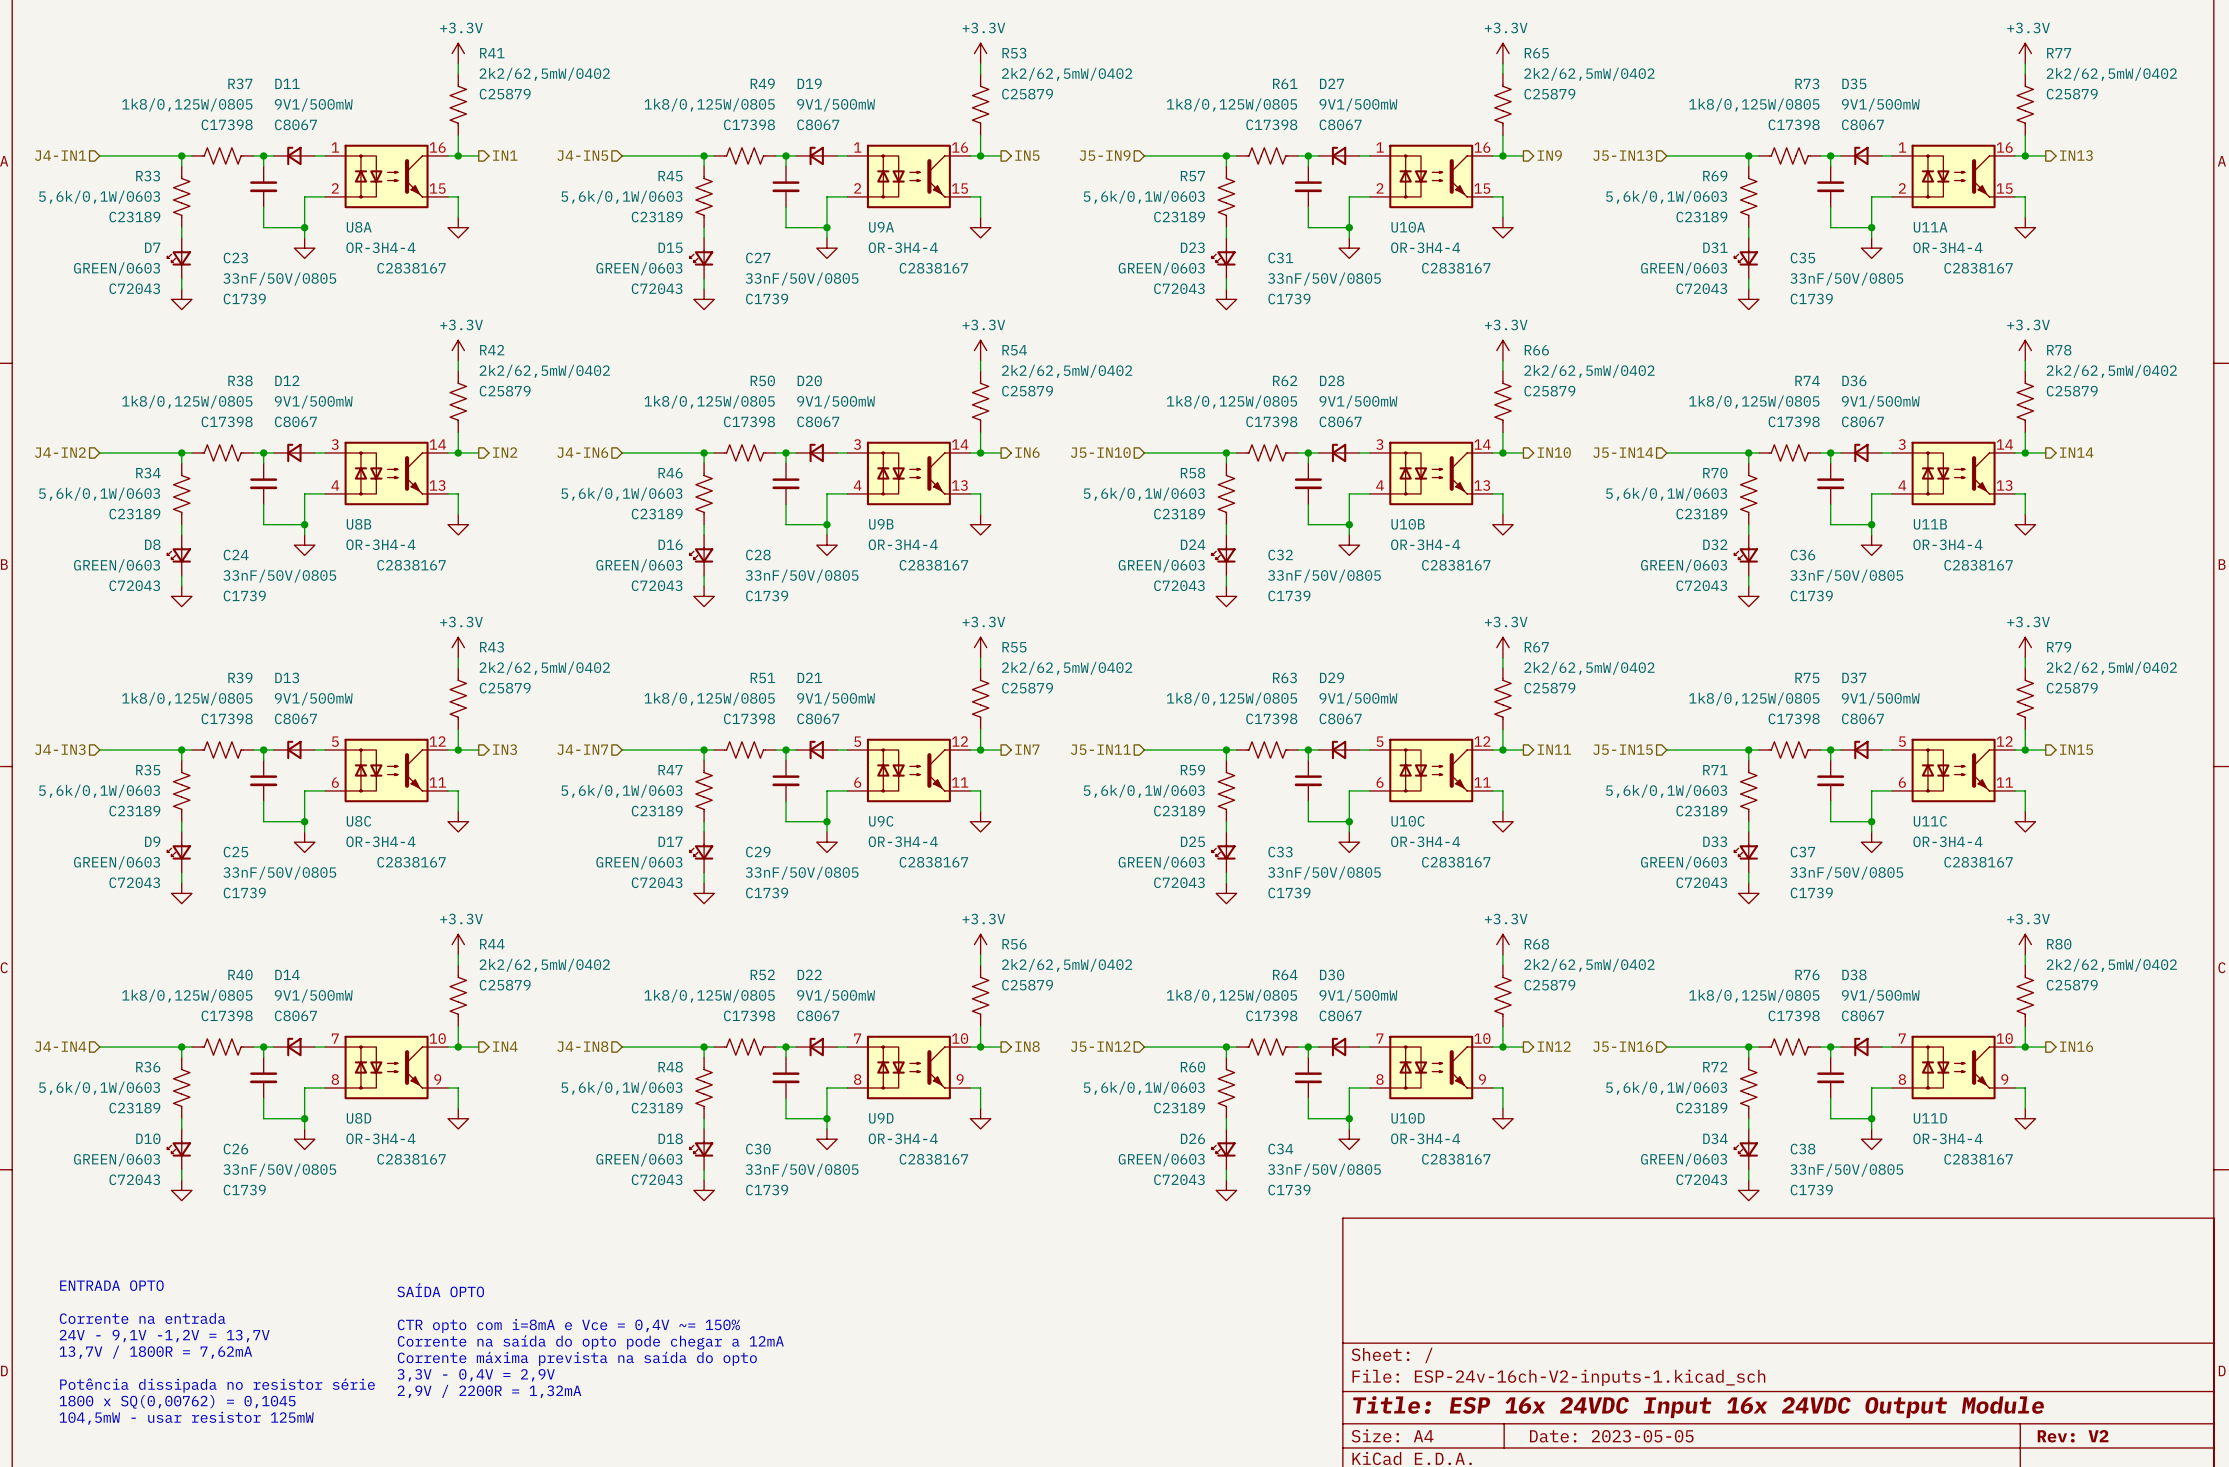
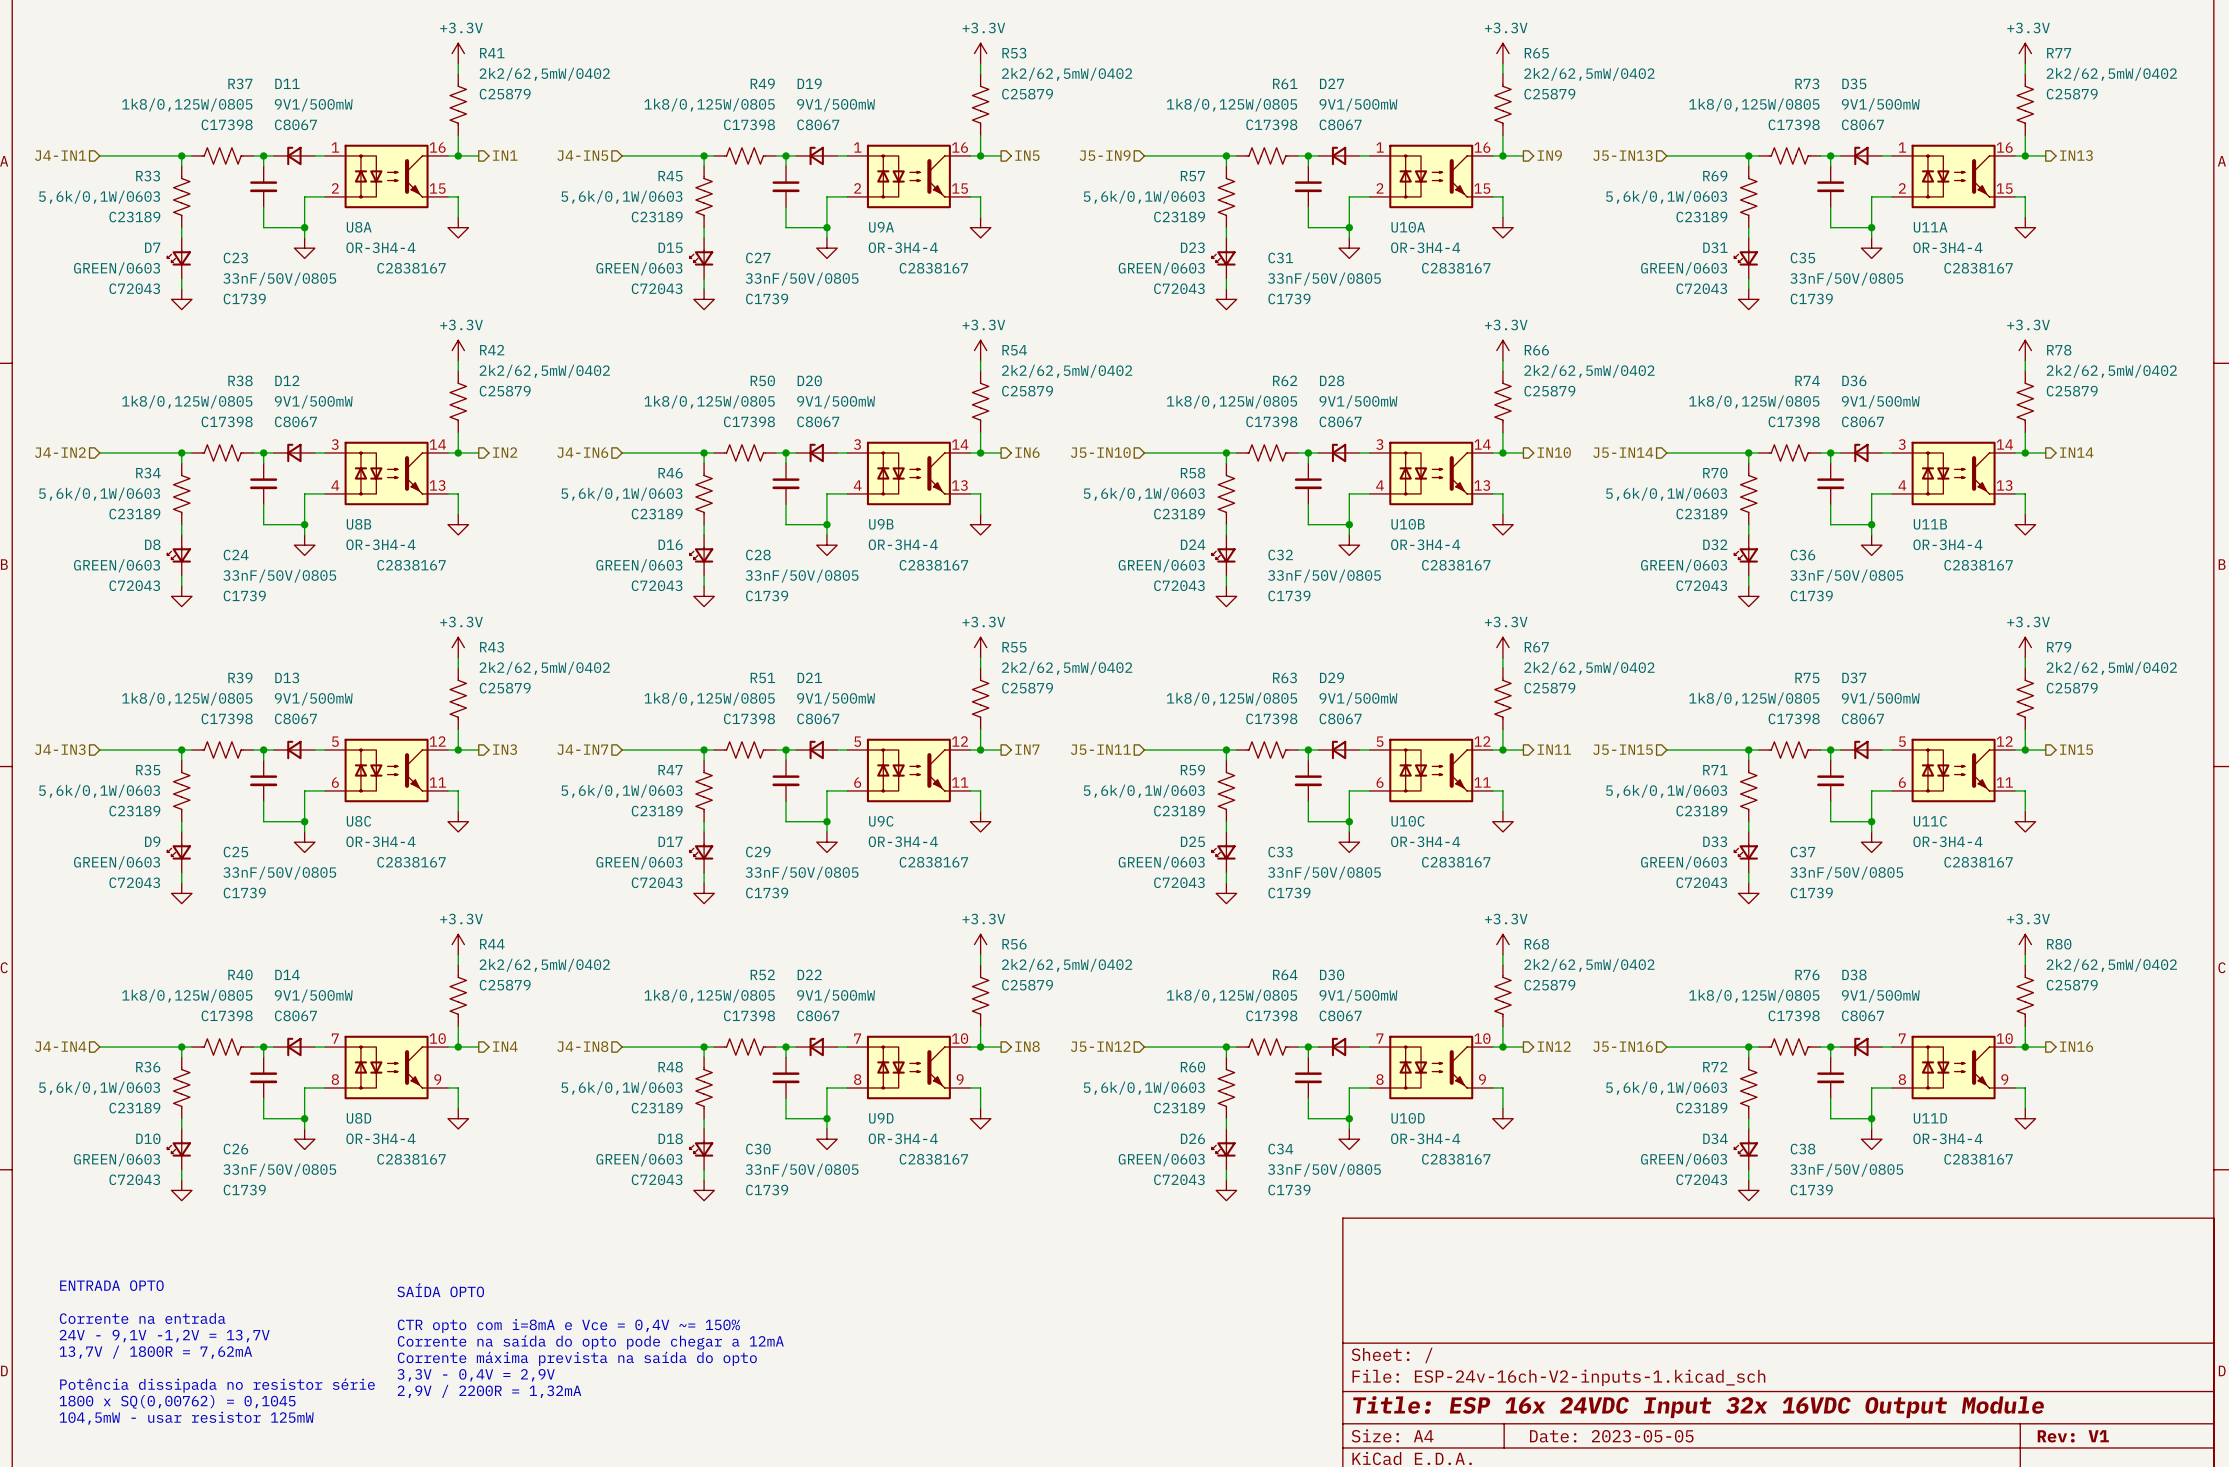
title block: Title: ESP 16x 24VDC Input 16x 24VDC Output Module (1698, 1407) -> Title: ESP 16x 24VDC Input 32x 16VDC Output Module (1698, 1407)
title block: Rev: V2 (2073, 1436) -> Rev: V1 (2073, 1436)

